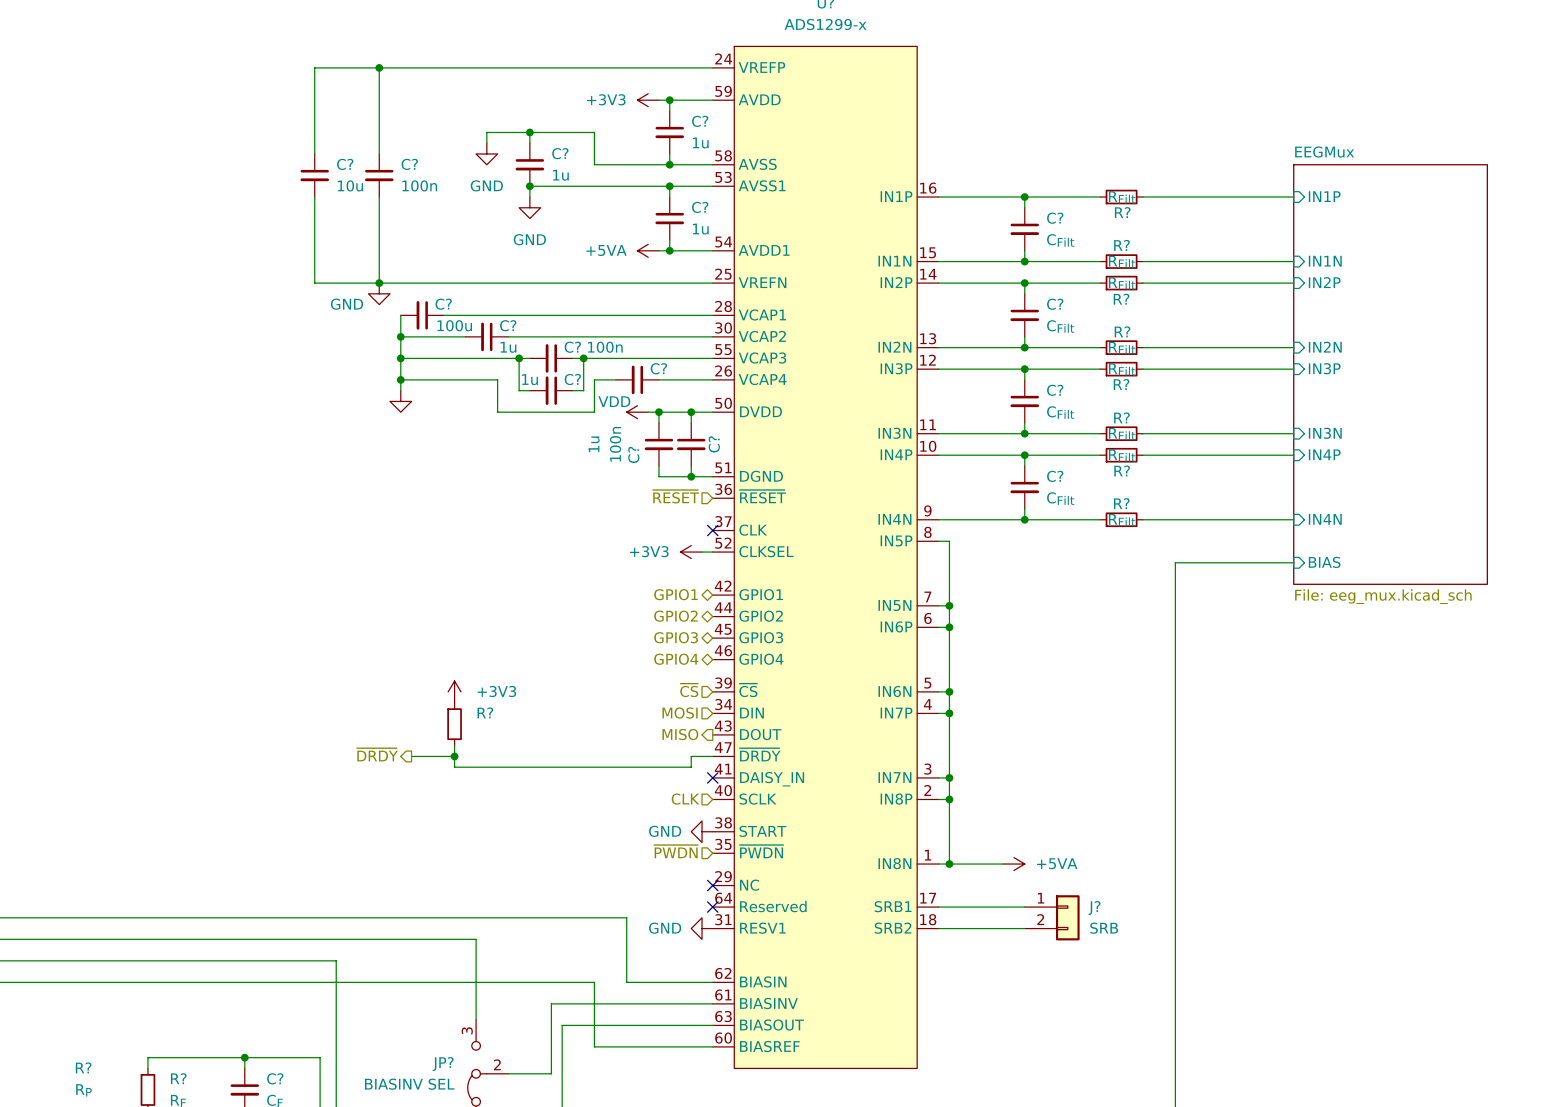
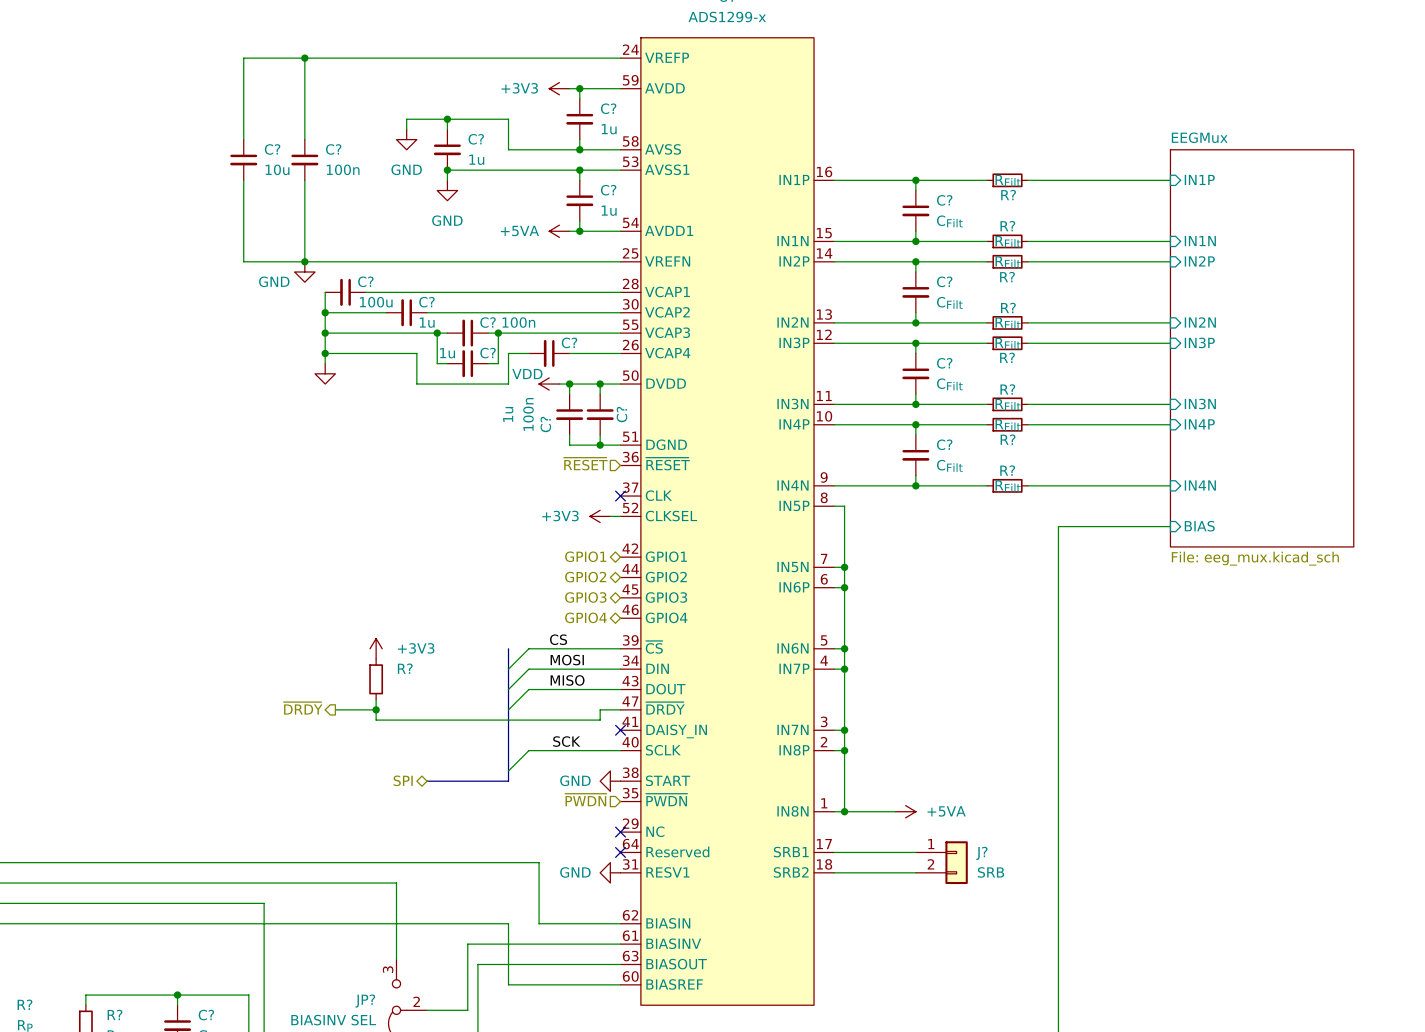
label: none -> CS (558, 639)
hierarchical label: ~{CS} (689, 690) -> none
bus: none -> (508, 648) (508, 781) (427, 781)
wire: none -> (620, 648) (528, 648) (508, 669)
label: none -> MOSI (567, 660)
hierarchical label: MOSI (680, 713) -> none
wire: none -> (620, 669) (528, 669) (508, 689)
label: none -> MISO (567, 680)
hierarchical label: MISO (680, 734) -> none
wire: none -> (620, 689) (528, 689) (508, 709)
label: none -> SCK (566, 741)
hierarchical label: CLK (685, 799) -> none
wire: none -> (620, 750) (528, 750) (508, 770)
hierarchical label: none -> SPI (403, 780)

